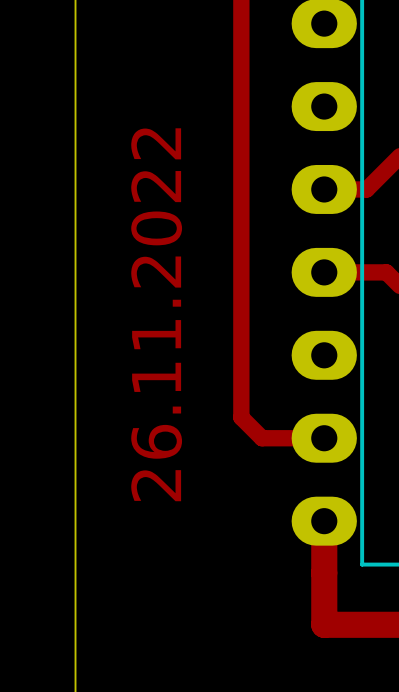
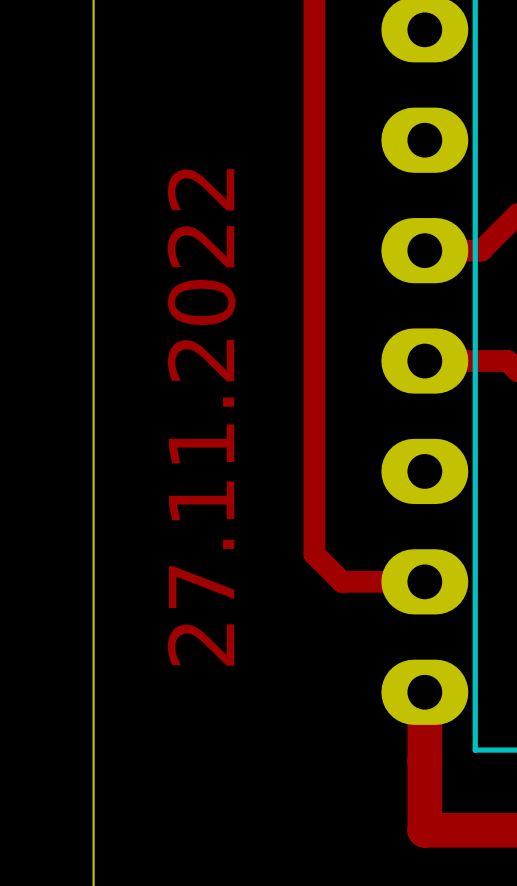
text: 26.11.2022 (156, 314) -> 27.11.2022 (201, 417)

